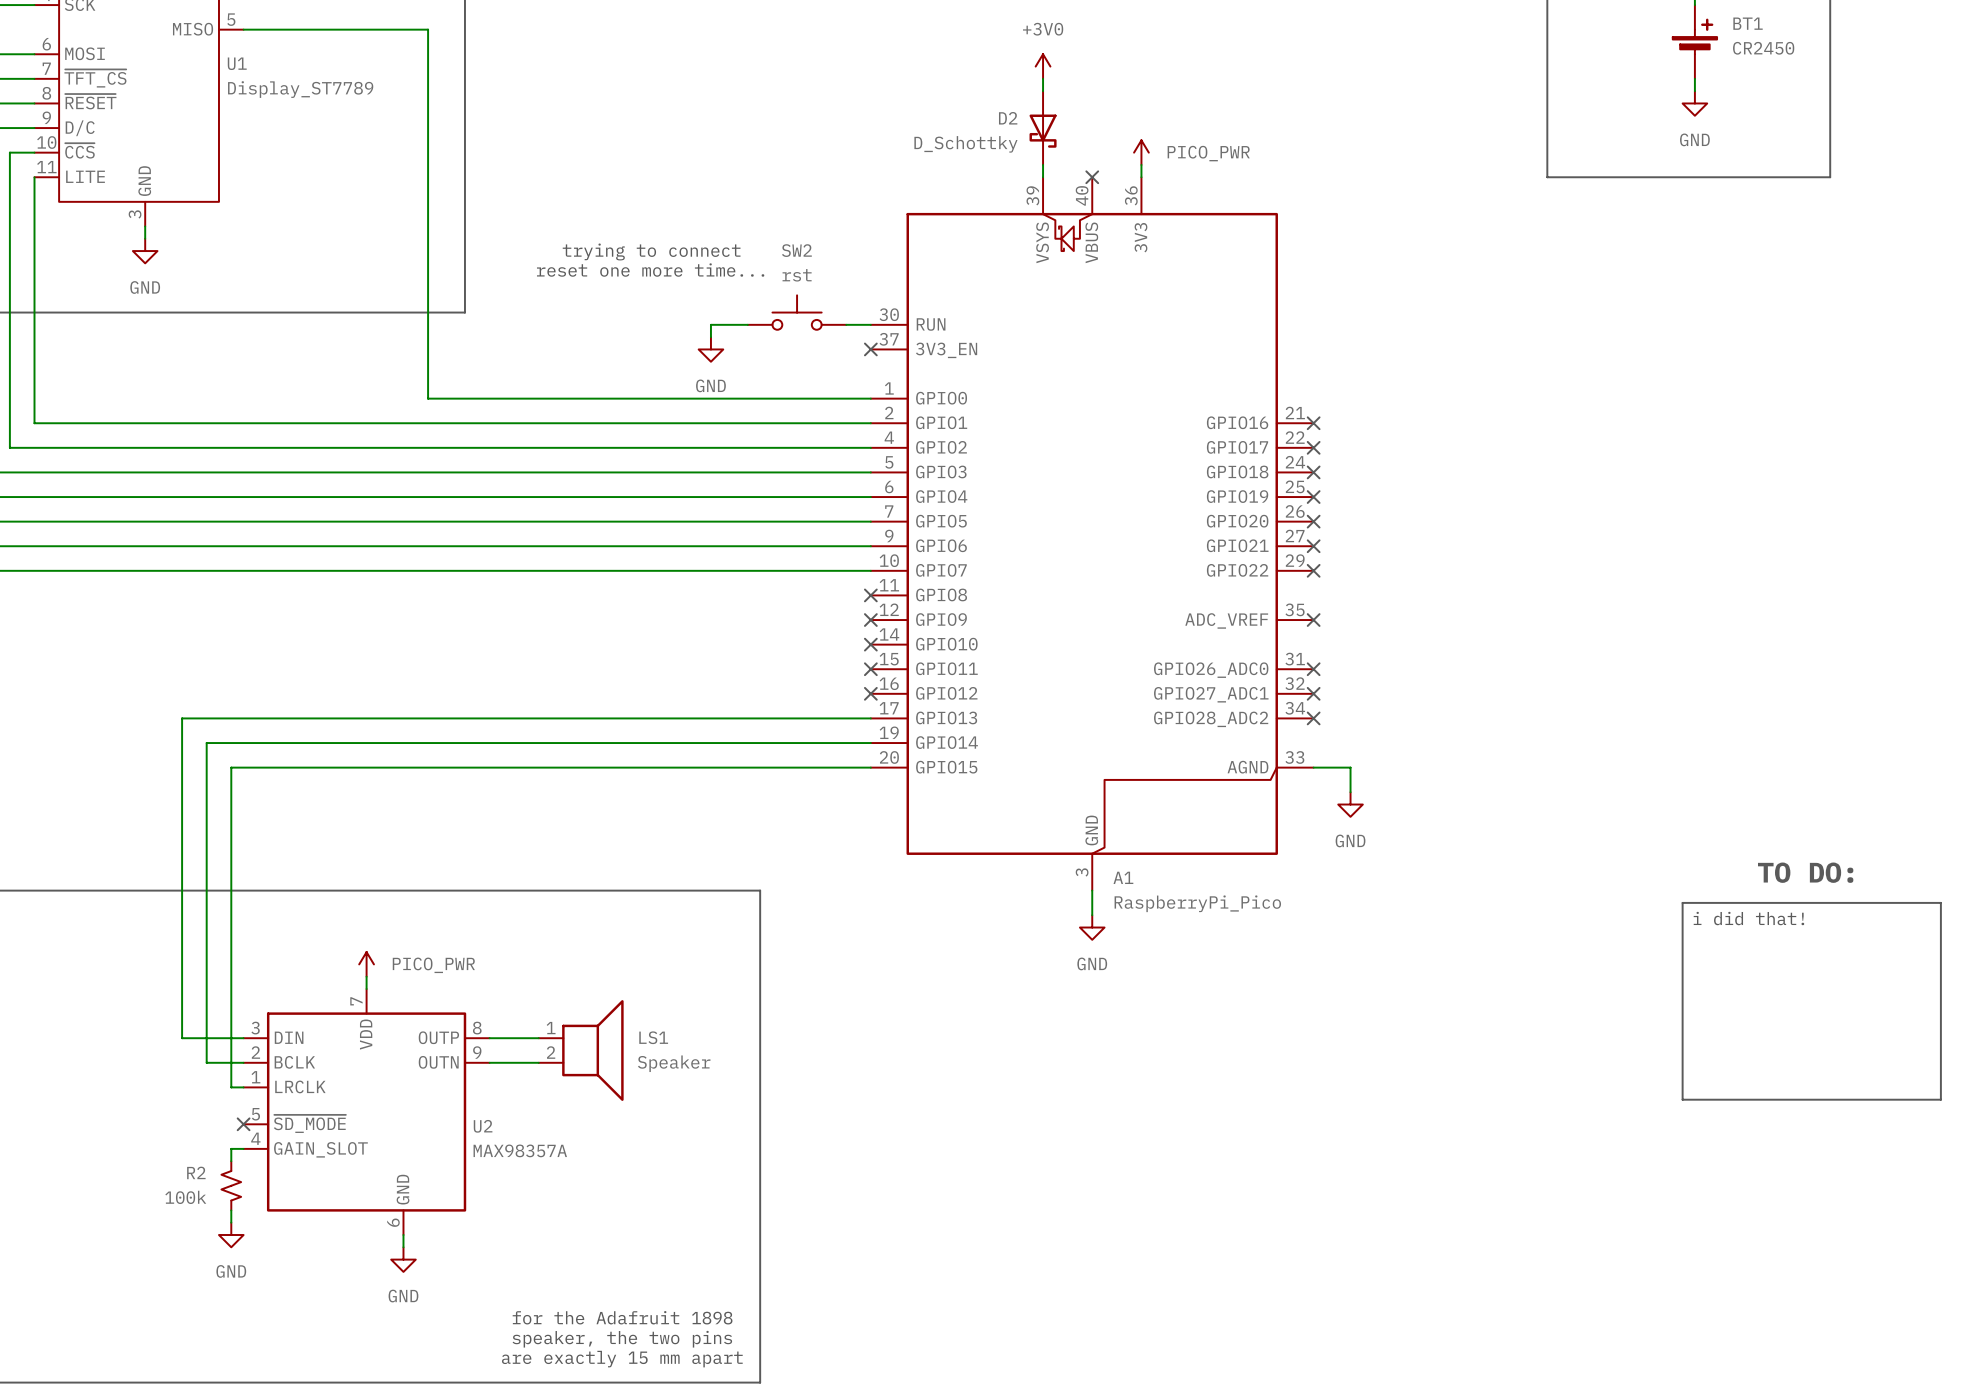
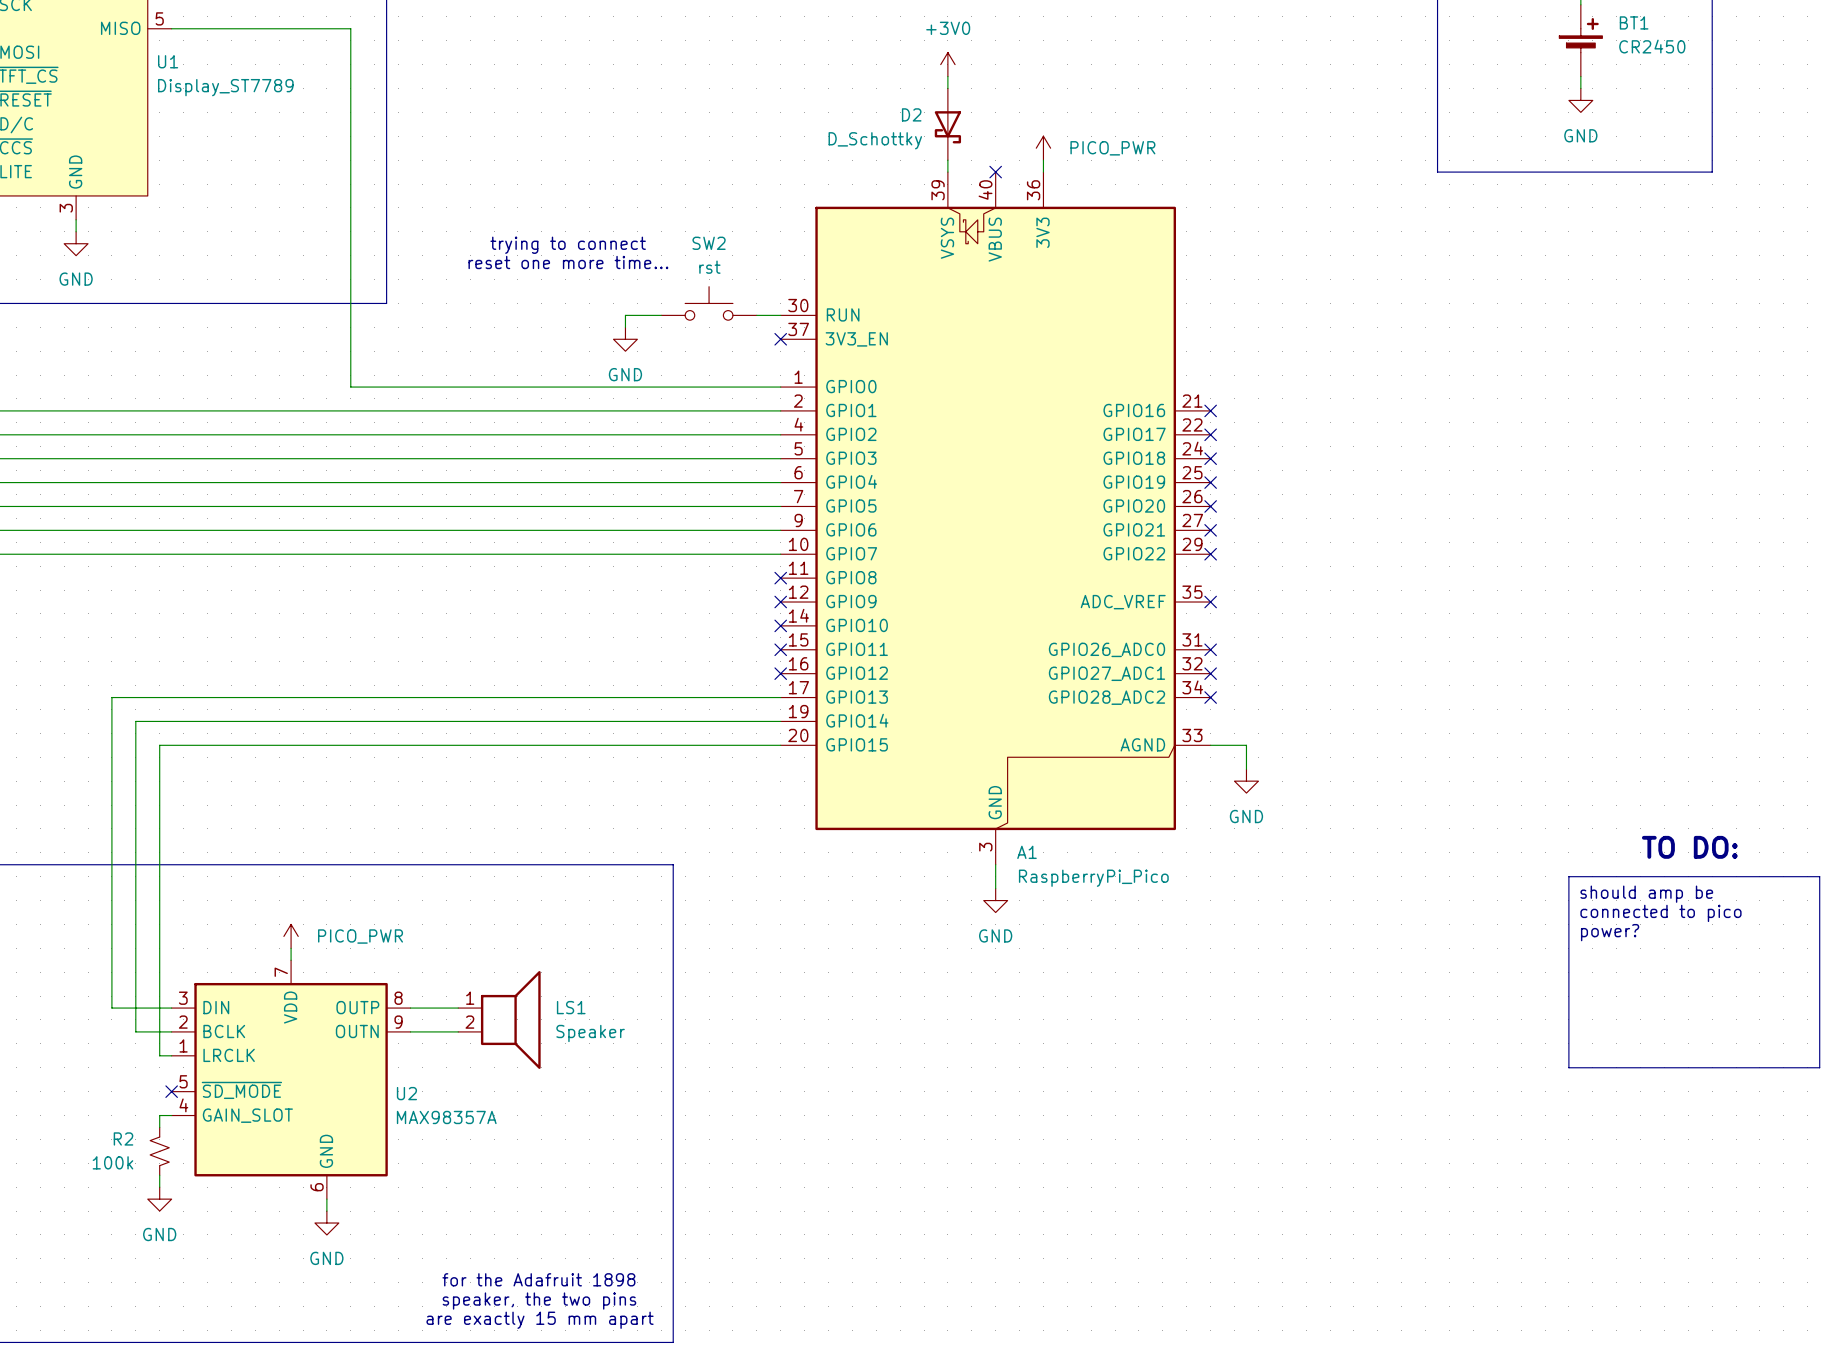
text: i did that! (1748, 918) -> should amp be (1646, 894)
text: none -> connected to pico (1660, 913)
text: none -> power? (1610, 932)

